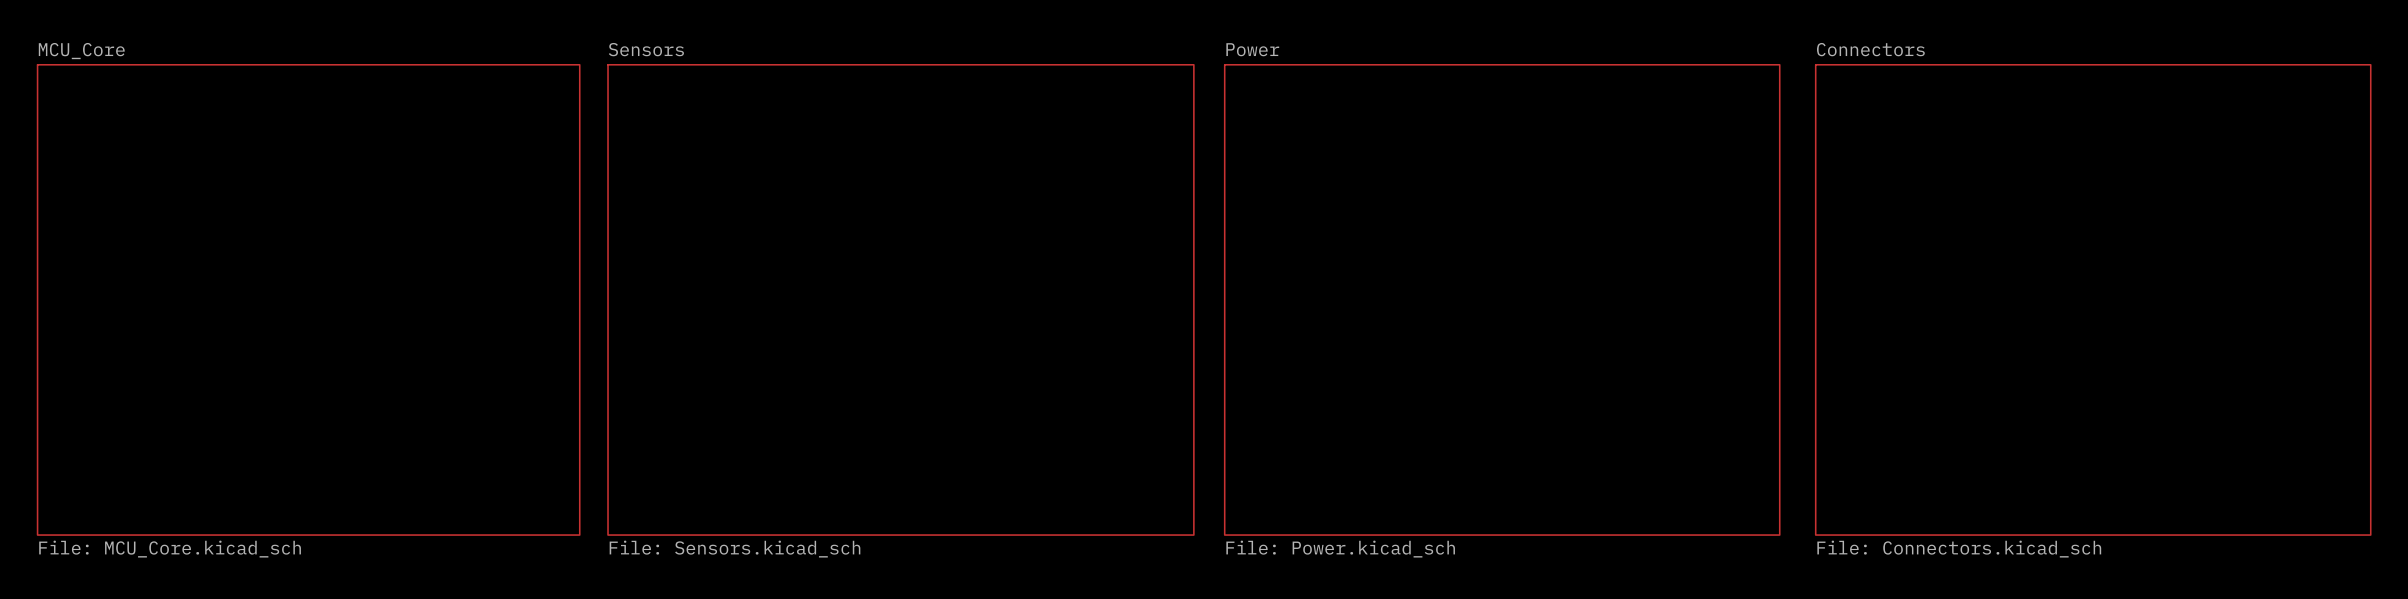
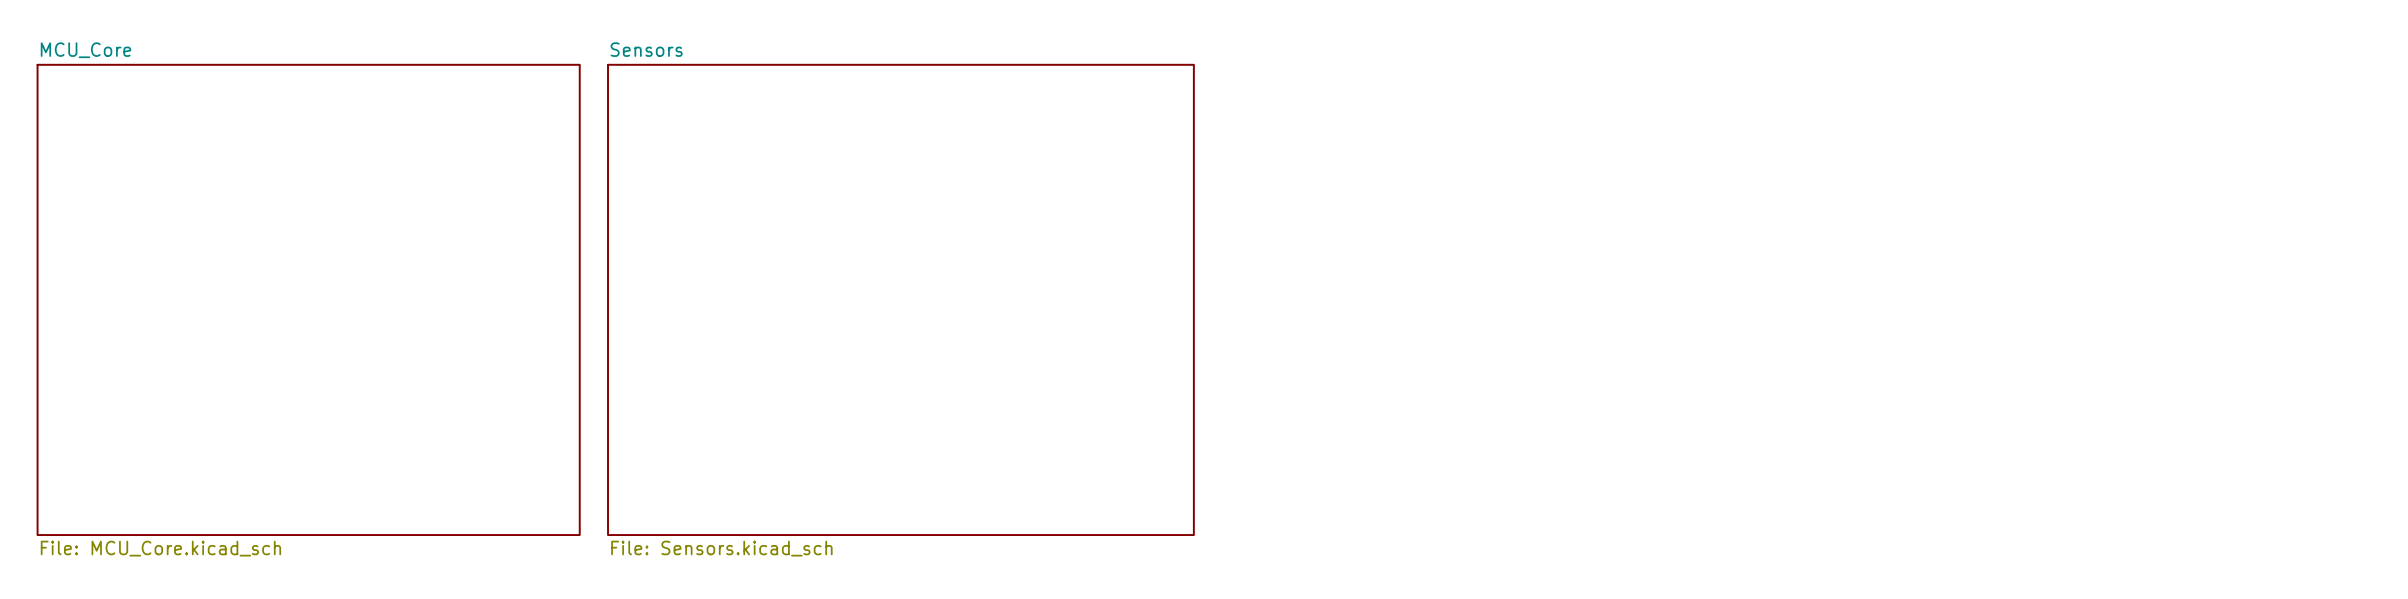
sheet Power: File: Power.kicad_sch (1502, 299) -> none
sheet Connectors: File: Connectors.kicad_sch (2093, 299) -> none

